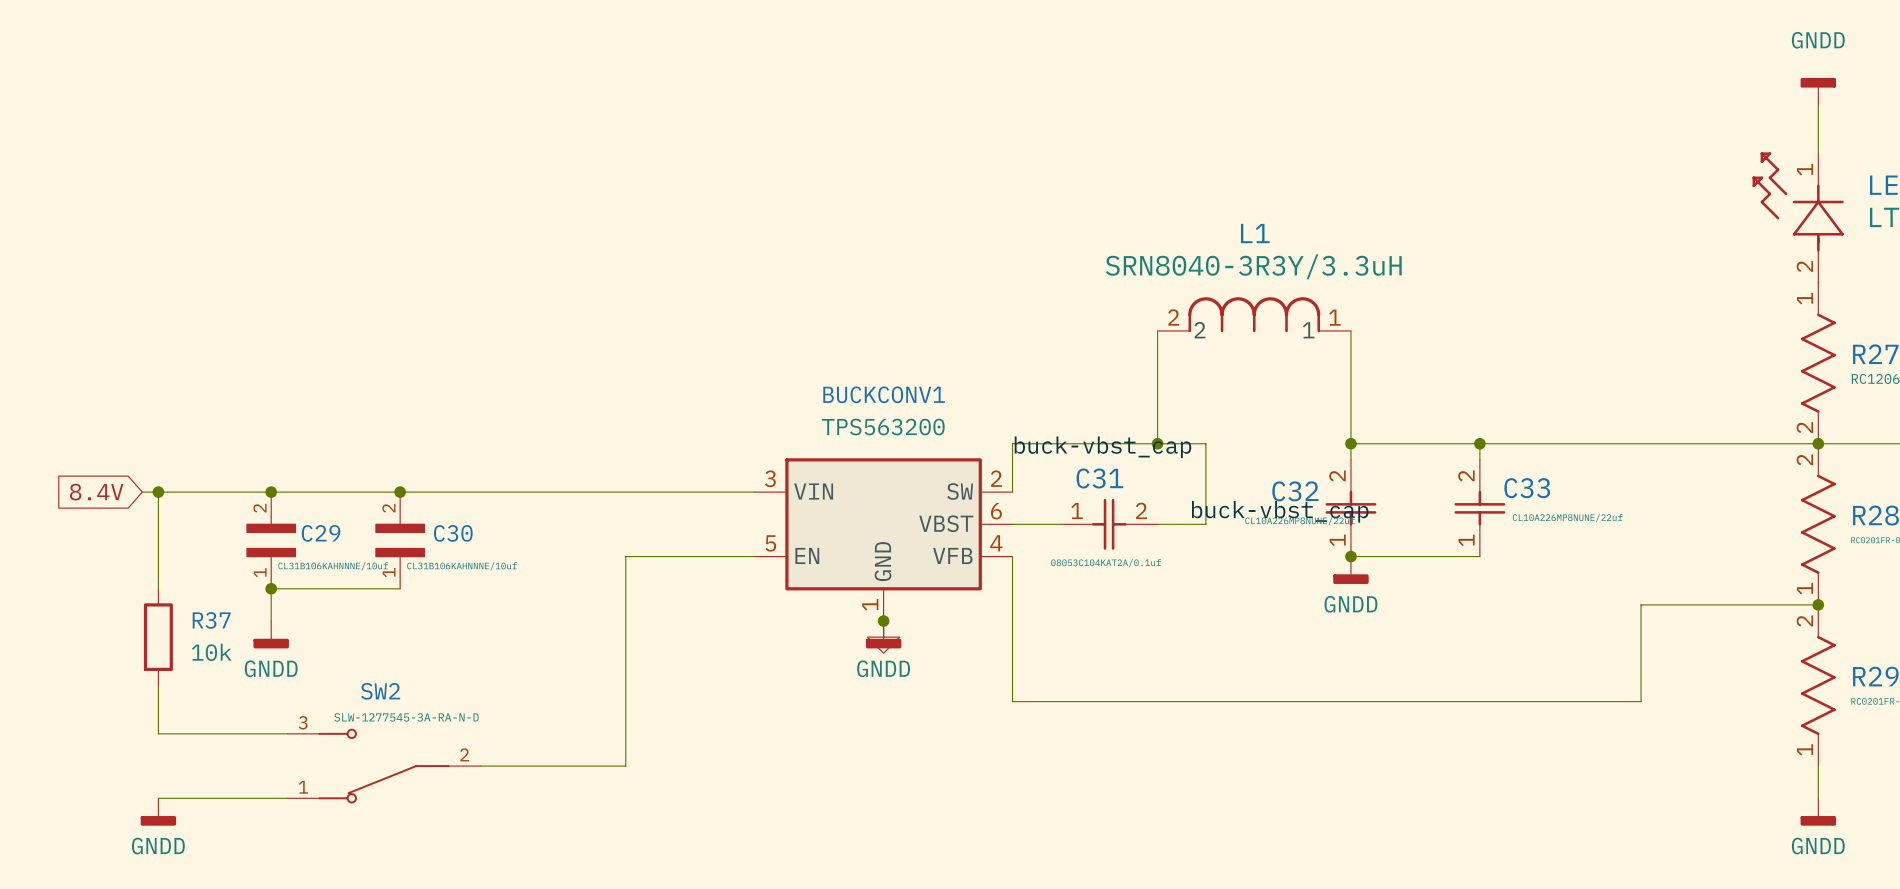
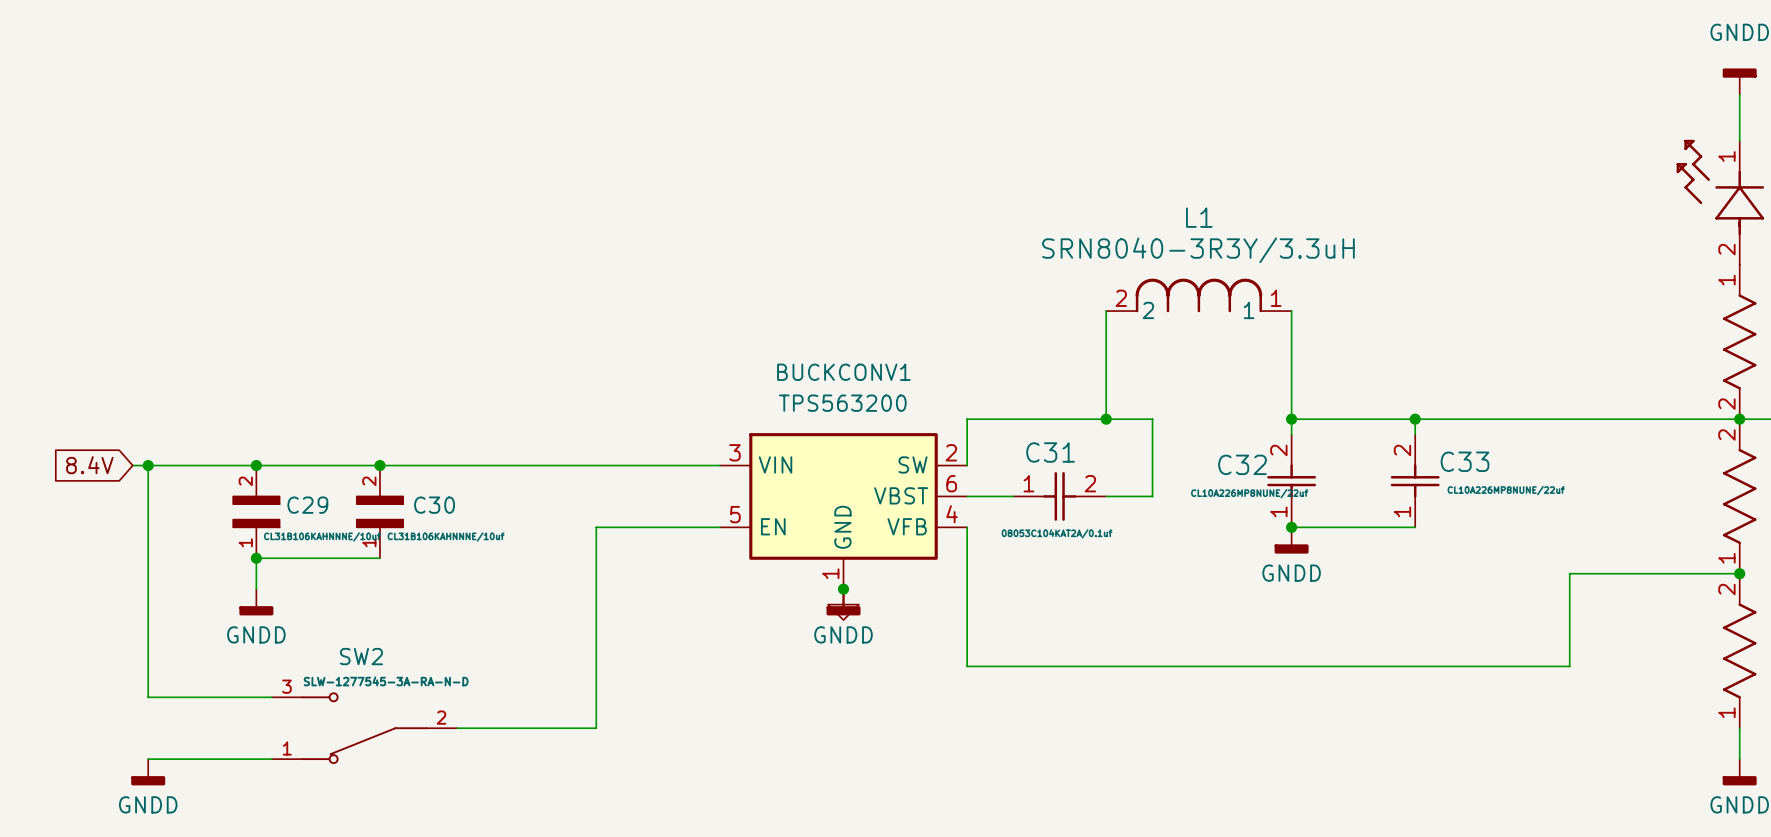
label: buck-vbst_cap (1102, 447) -> none
label: buck-vbst_cap (1280, 511) -> none
wire: none -> (148, 558) (148, 650)
R37: 10k (158, 637) -> none

